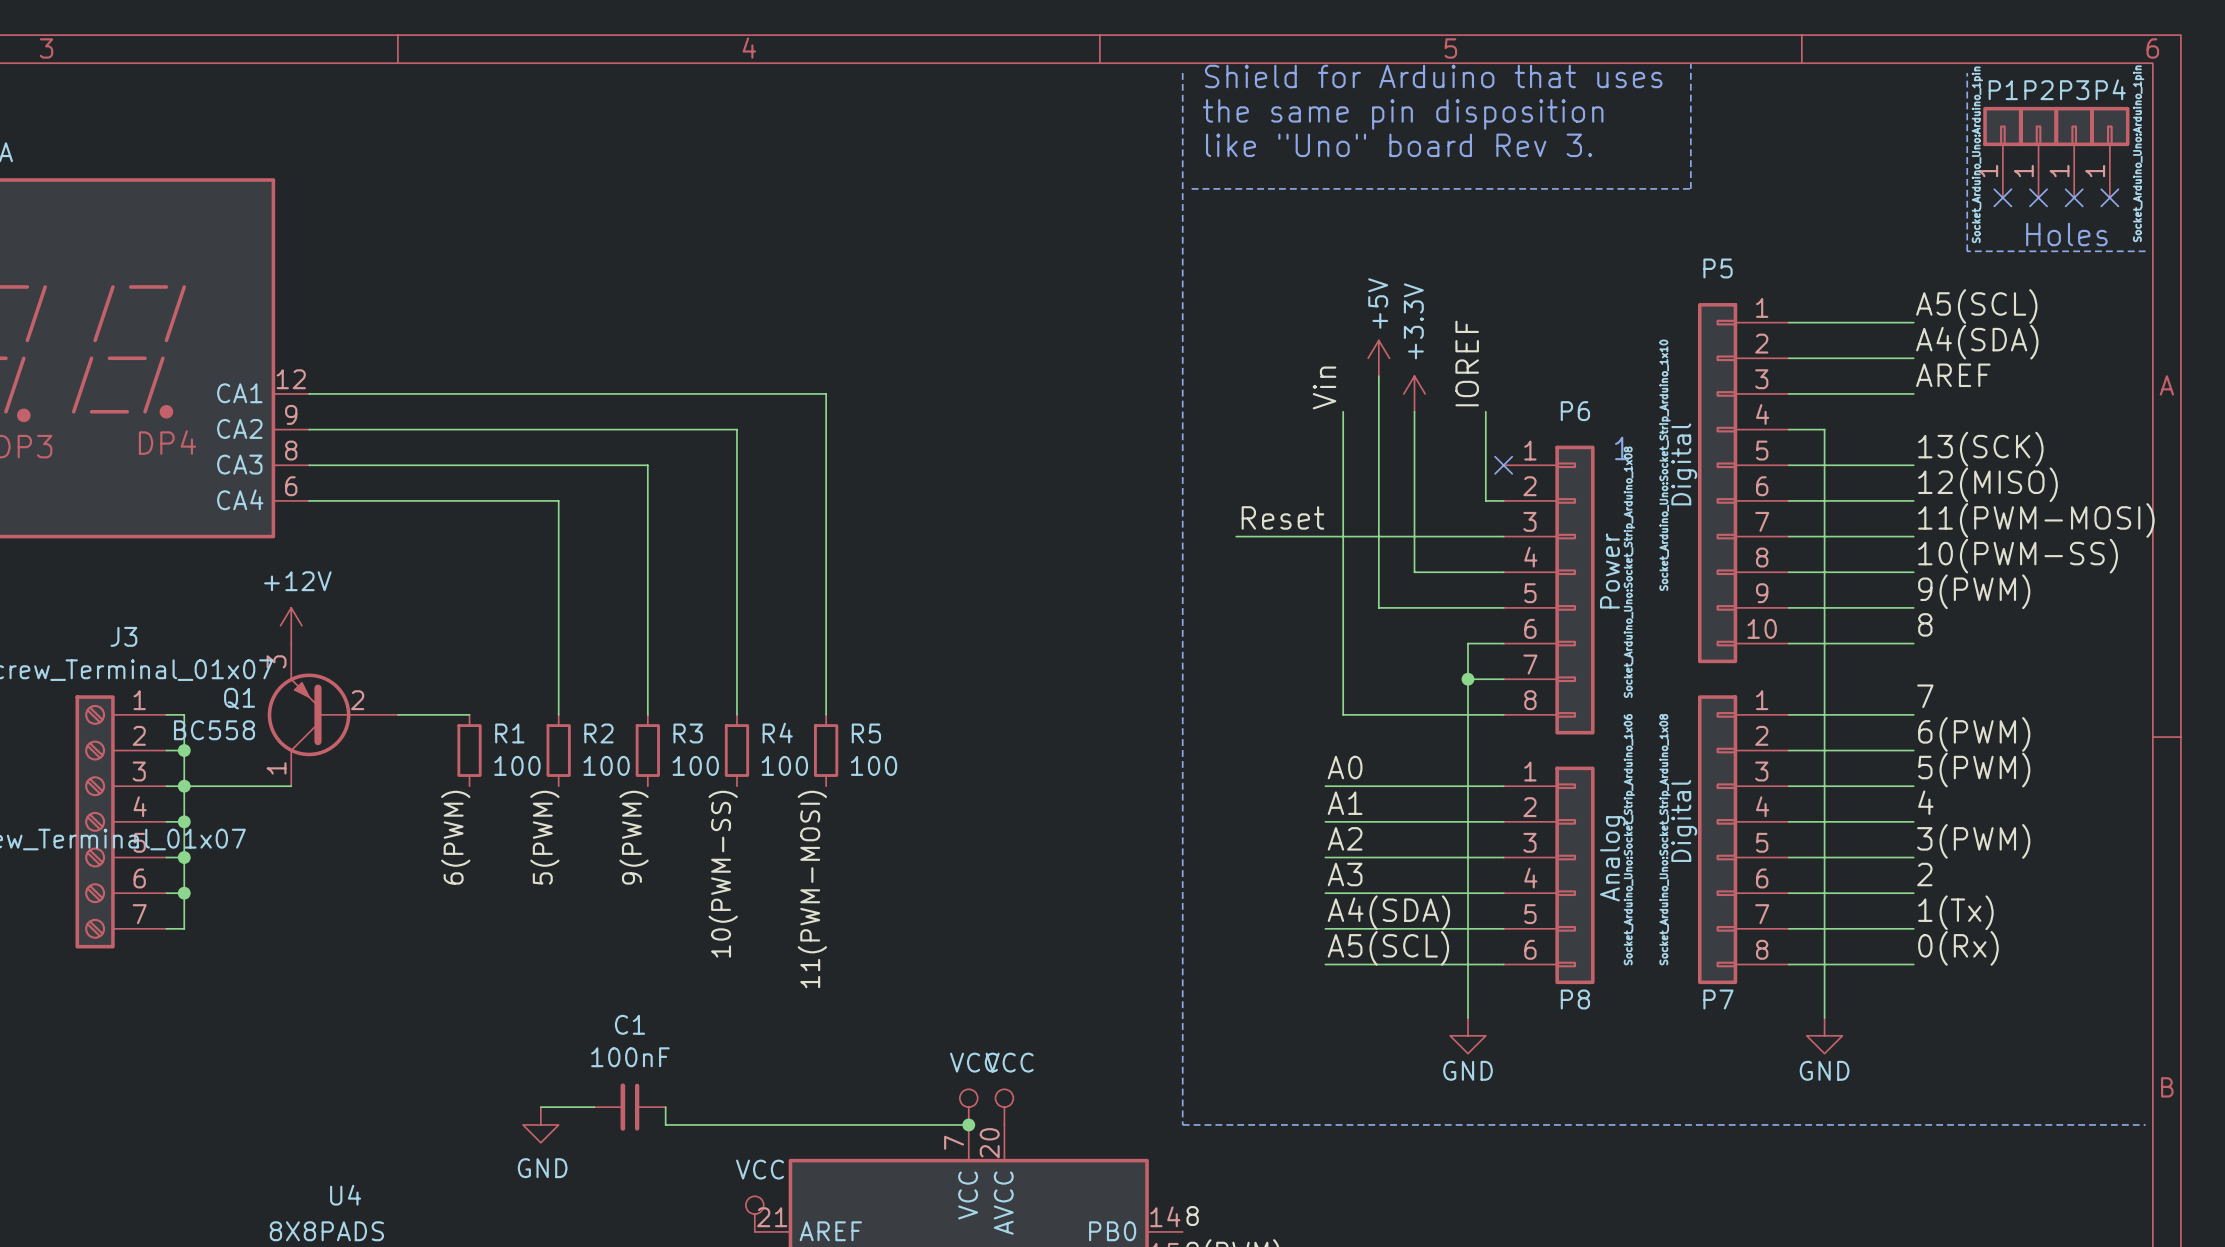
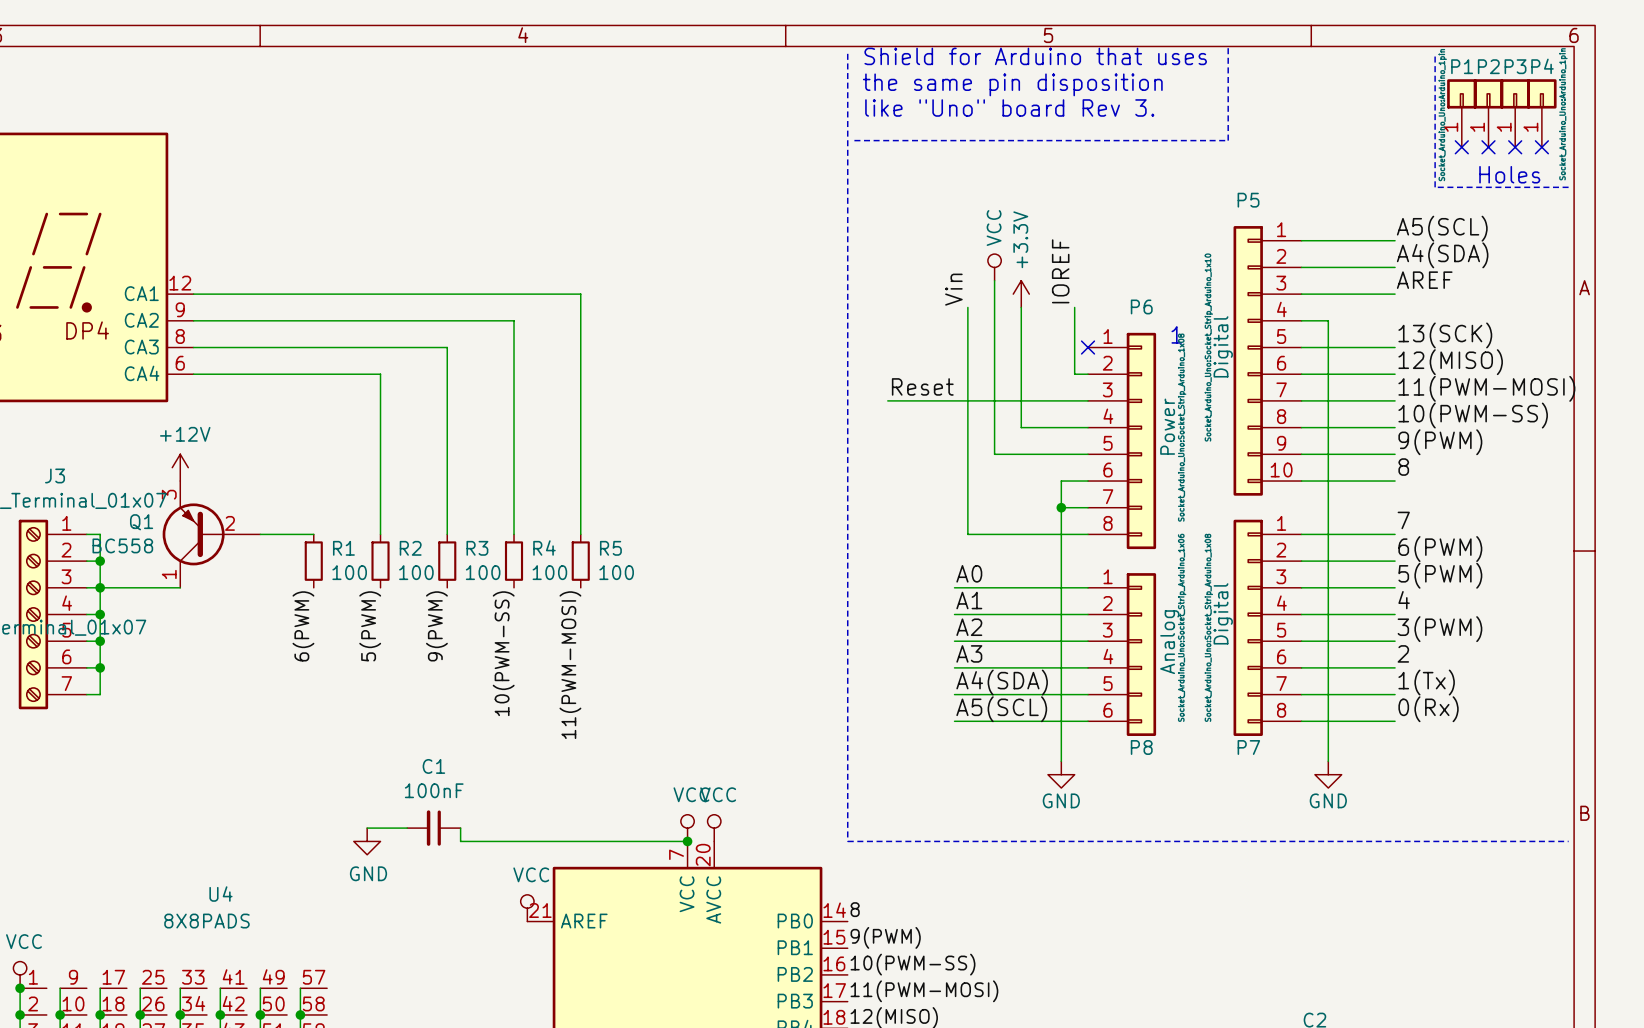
power symbol: +5V (1378, 358) -> VCC (994, 267)

